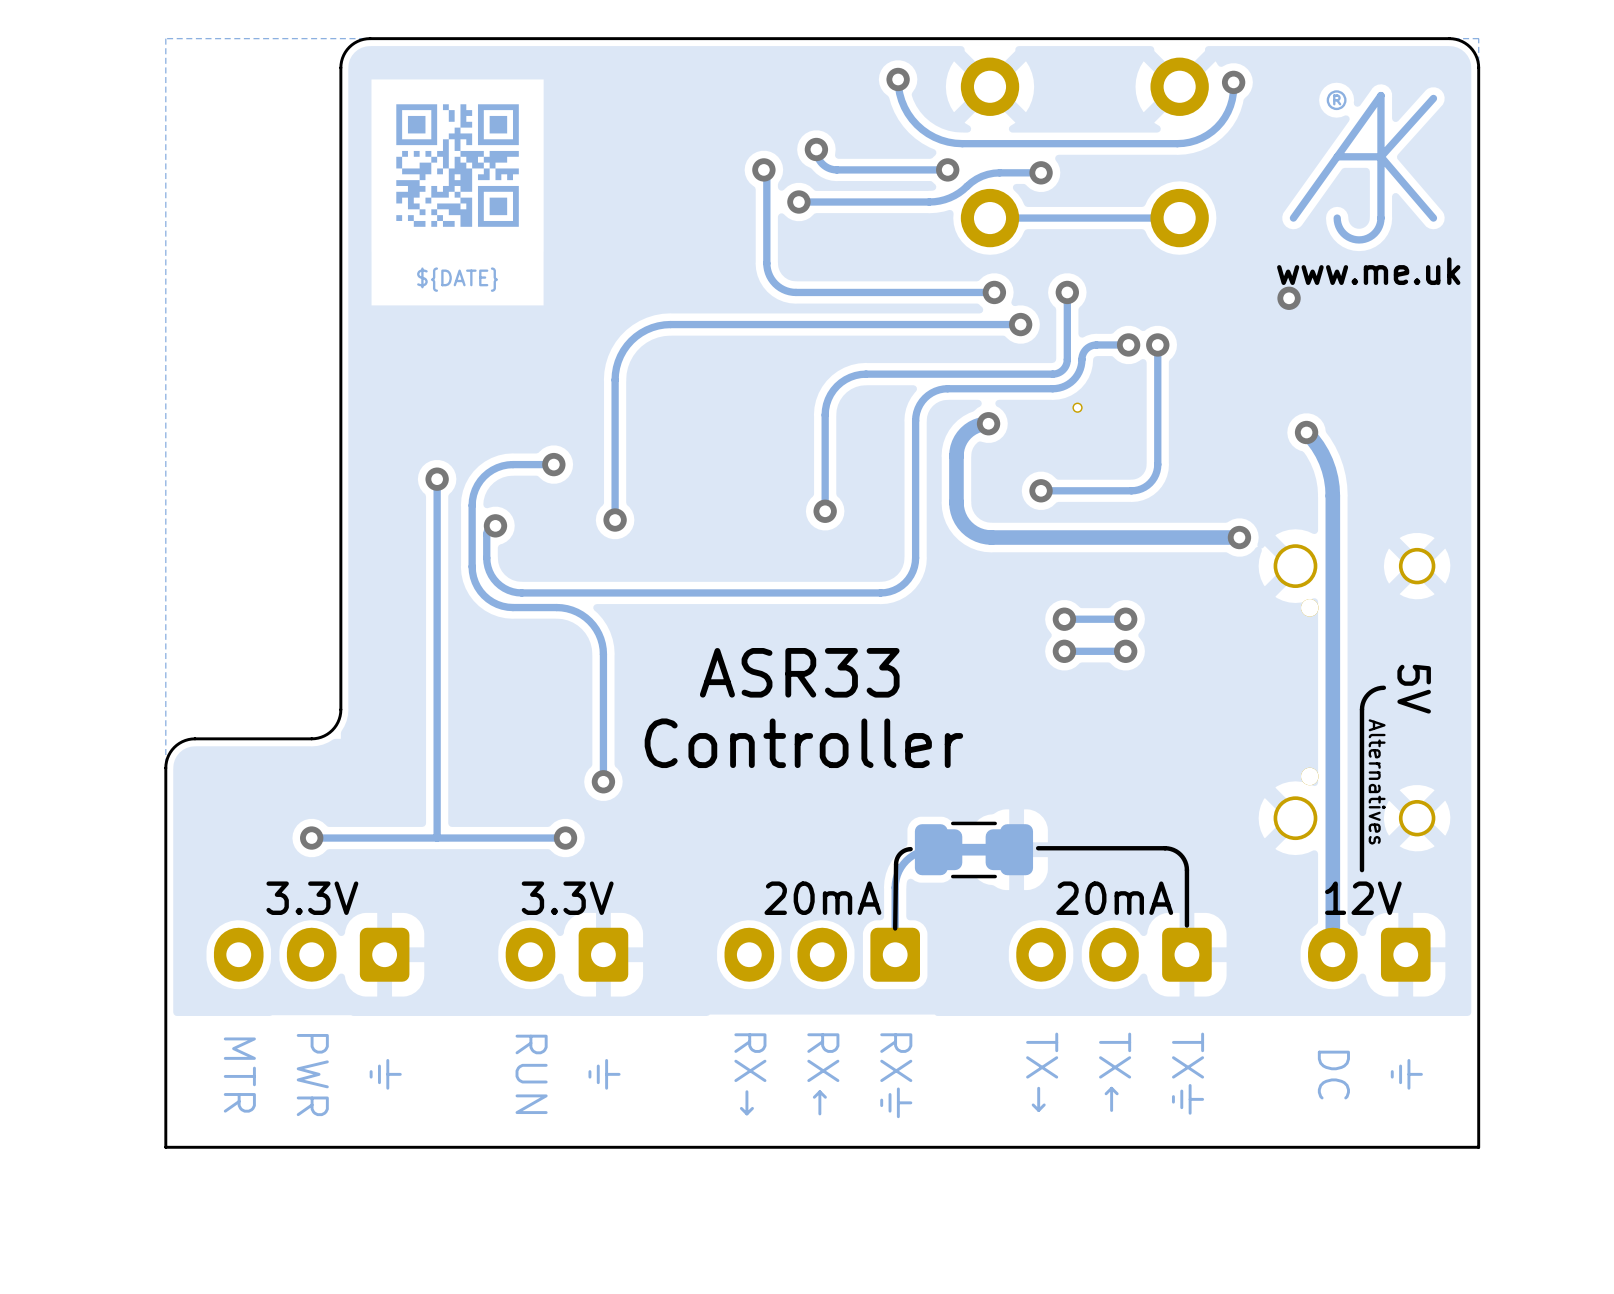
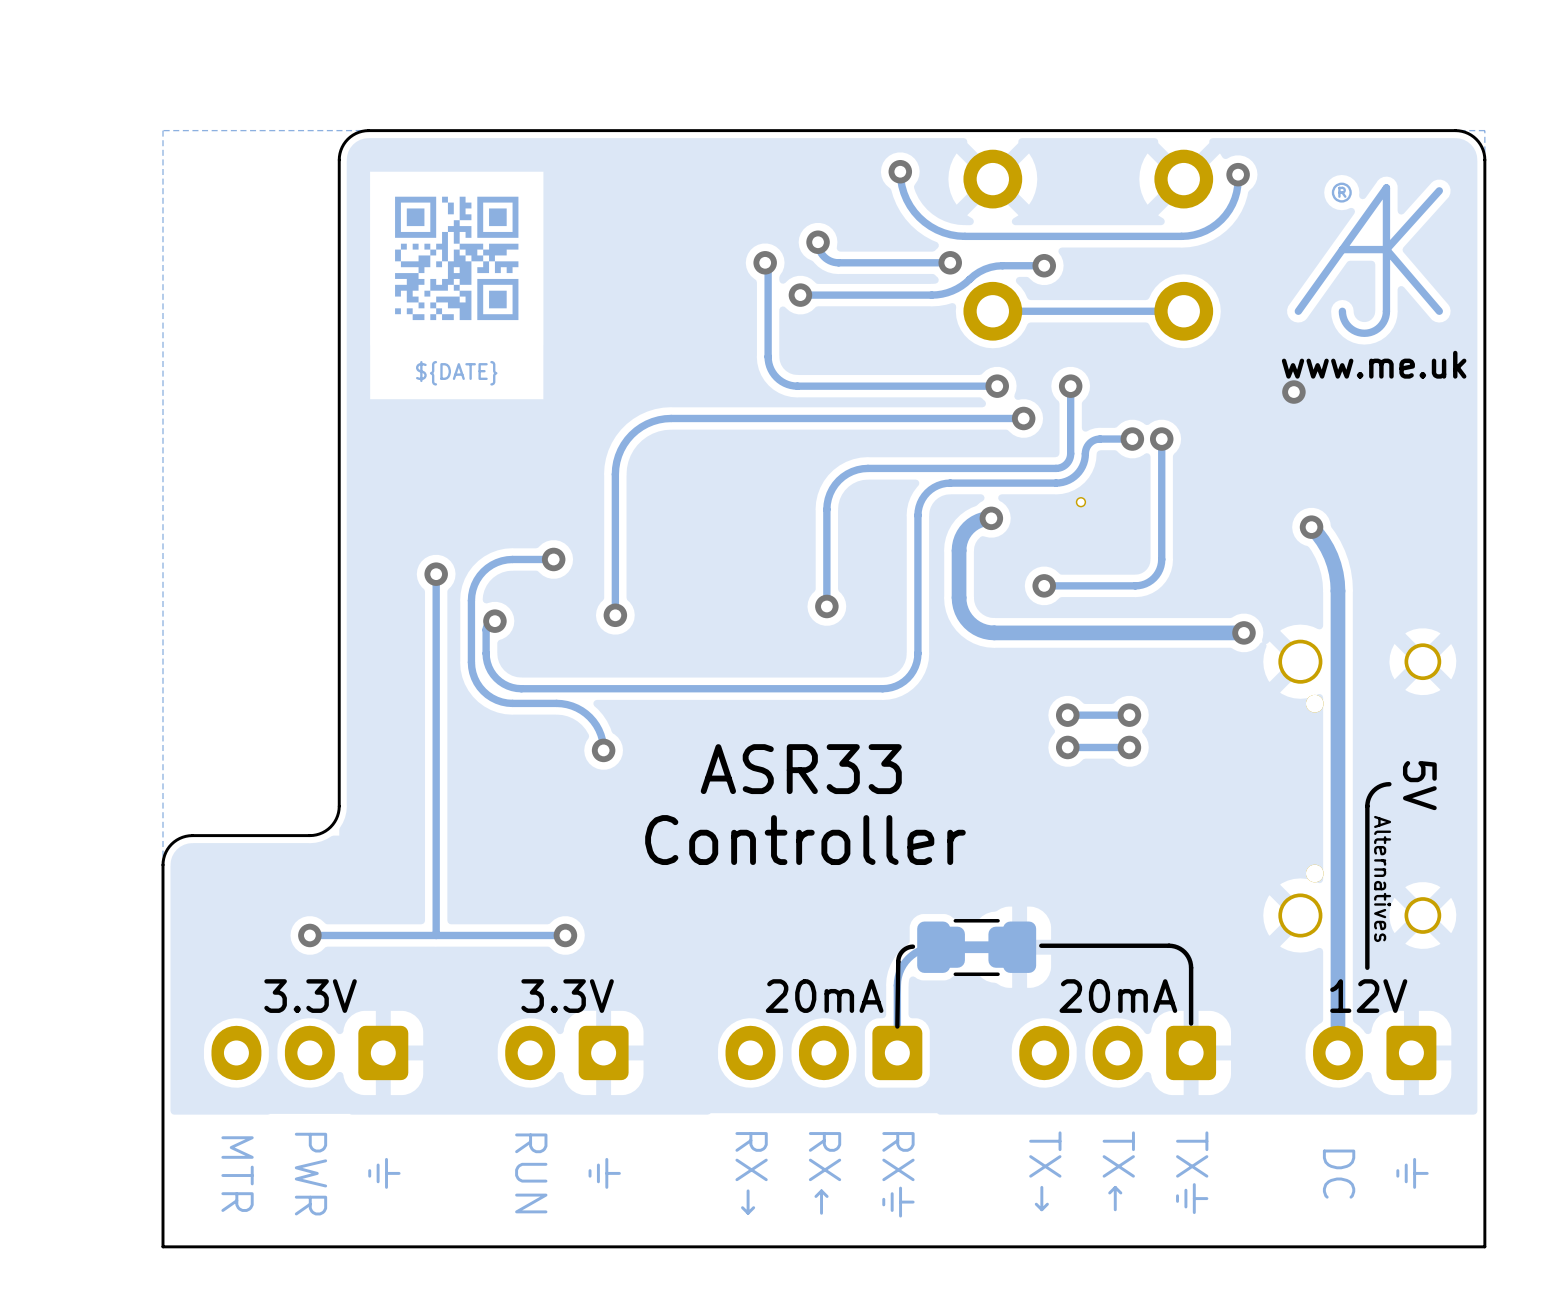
track: (603, 654) (603, 781) -> none
via position: (603, 781) -> (603, 750)

